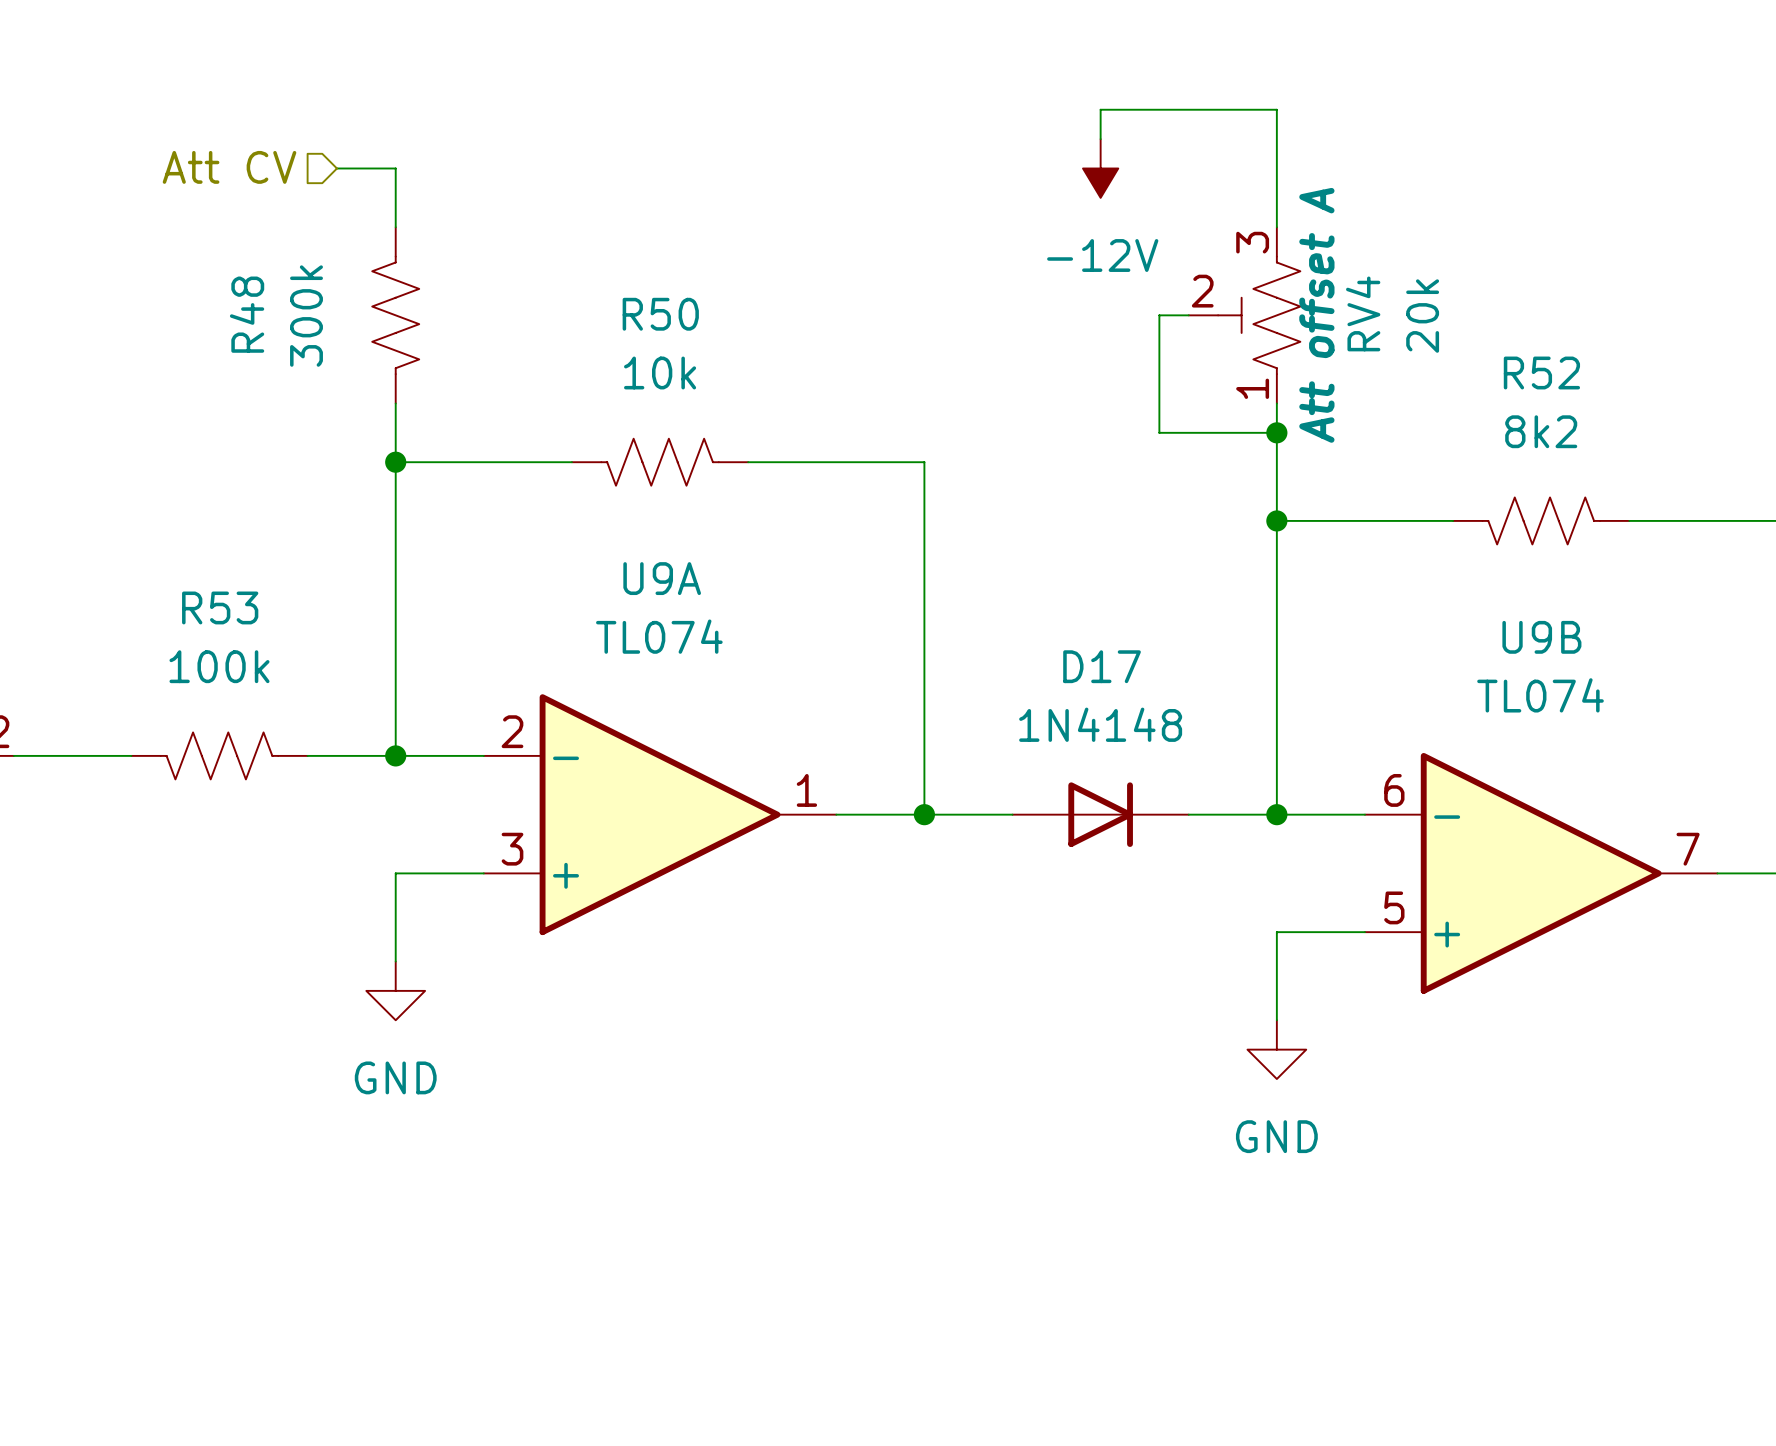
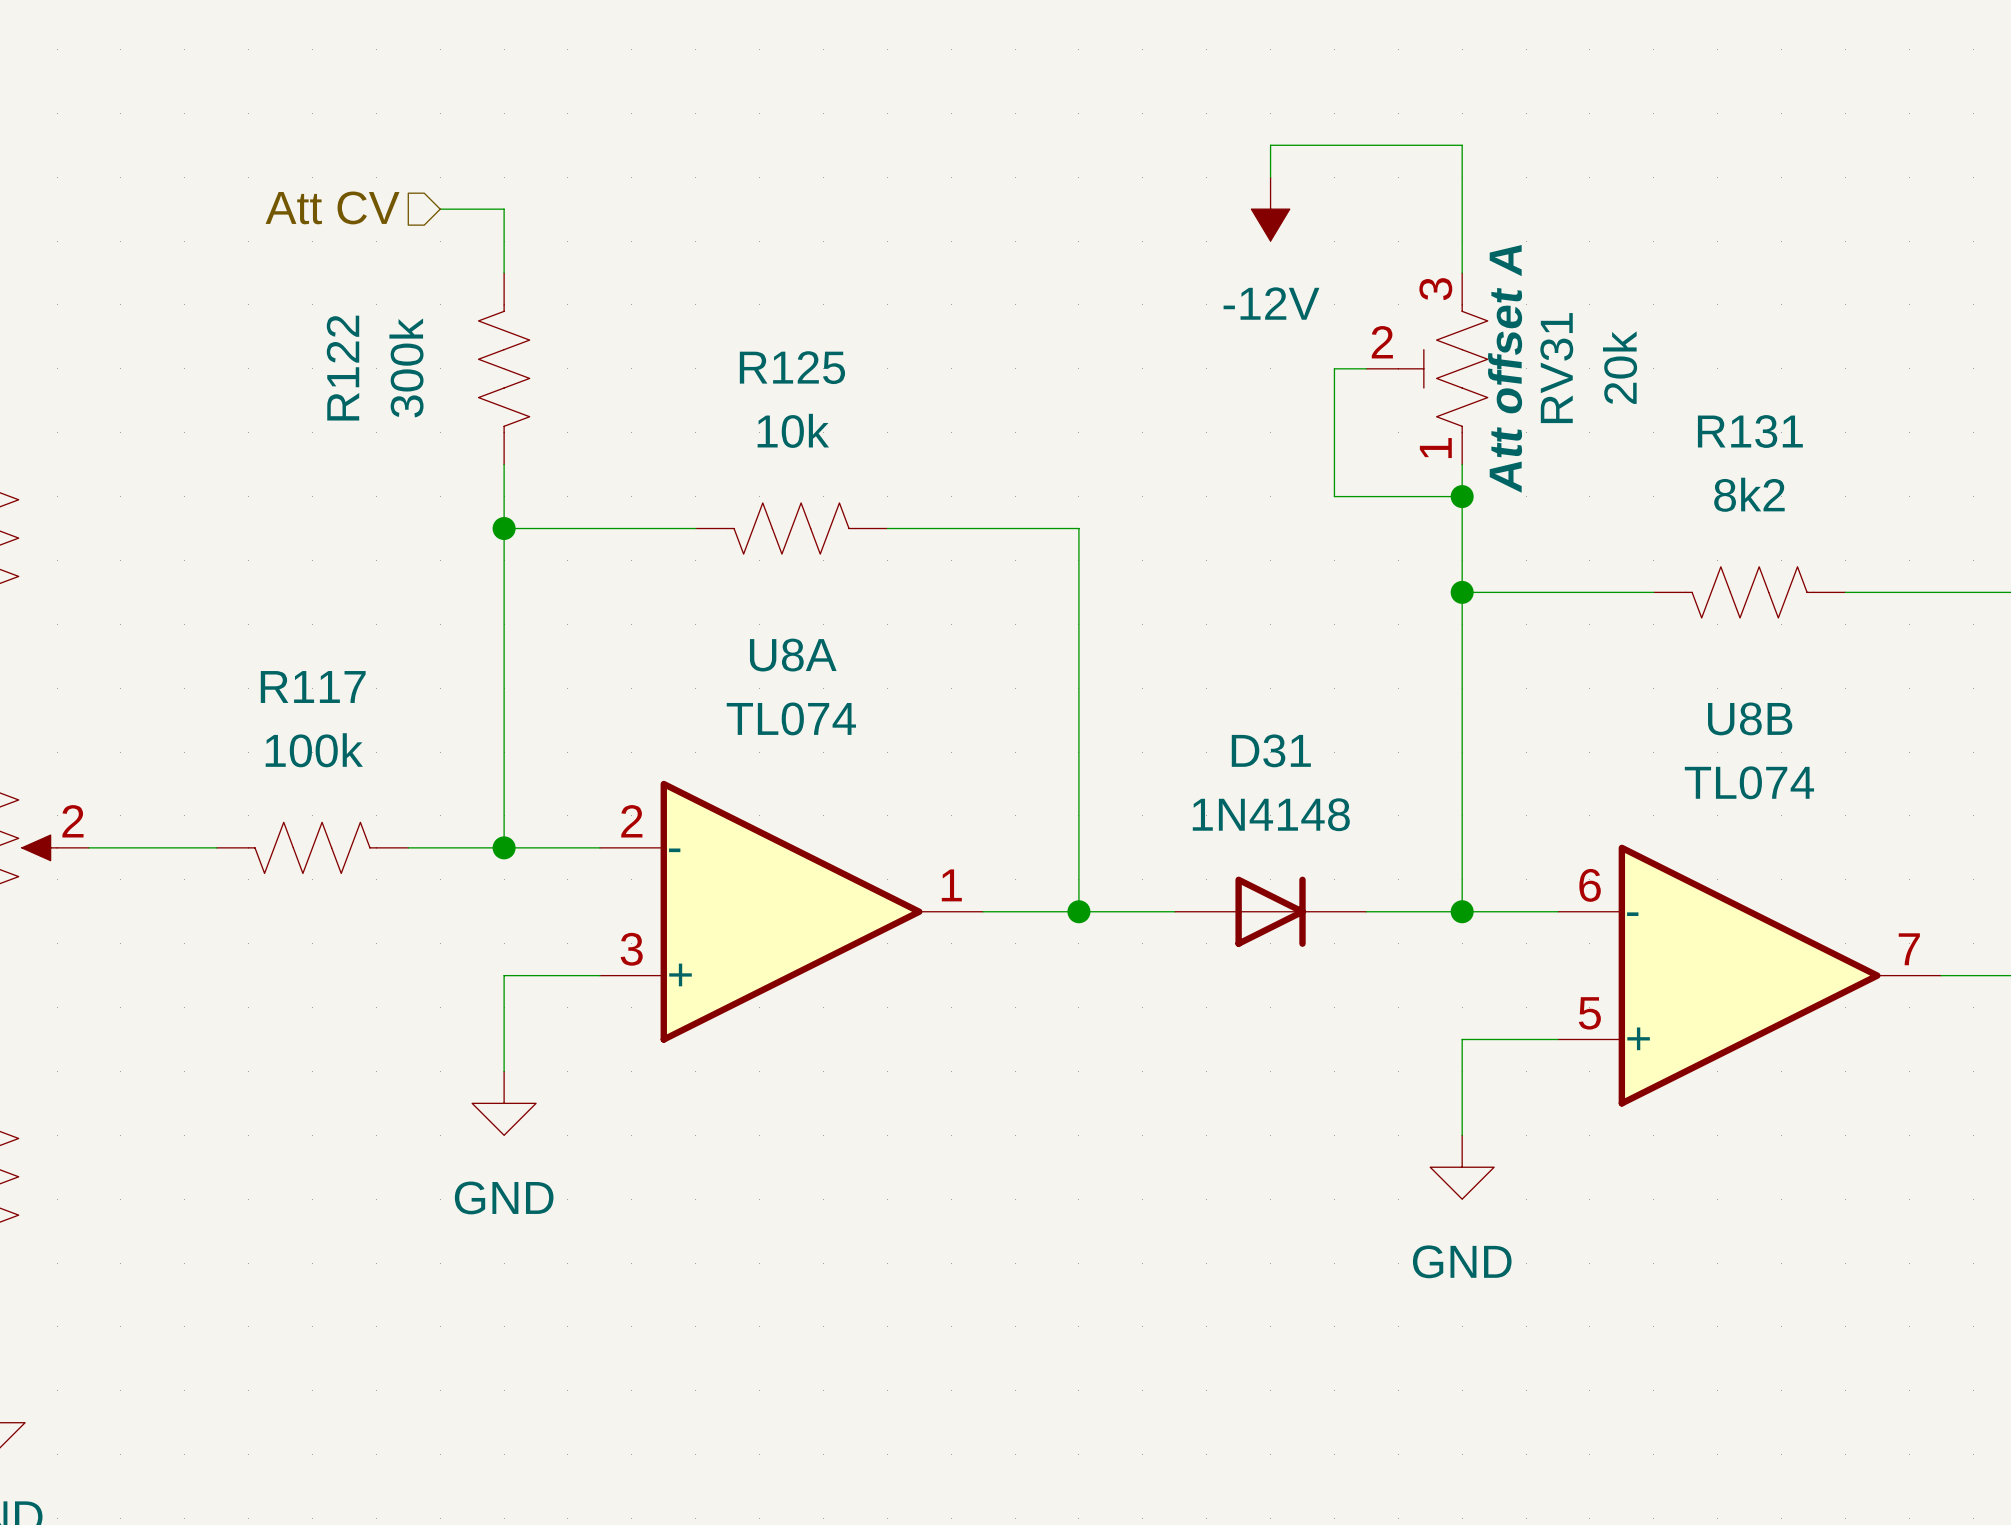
RV4 name: RV4 (1363, 313) -> RV31 (1556, 368)
R48 name: R48 (247, 314) -> R122 (342, 368)
R50 name: R50 (660, 314) -> R125 (792, 367)
R52 name: R52 (1541, 372) -> R131 (1750, 431)
U9A name: U9A (662, 578) -> U8A (793, 655)
R53 name: R53 (220, 607) -> R117 (313, 687)
U9B name: U9B (1541, 637) -> U8B (1750, 718)
D17 name: D17 (1102, 666) -> D31 (1271, 750)

